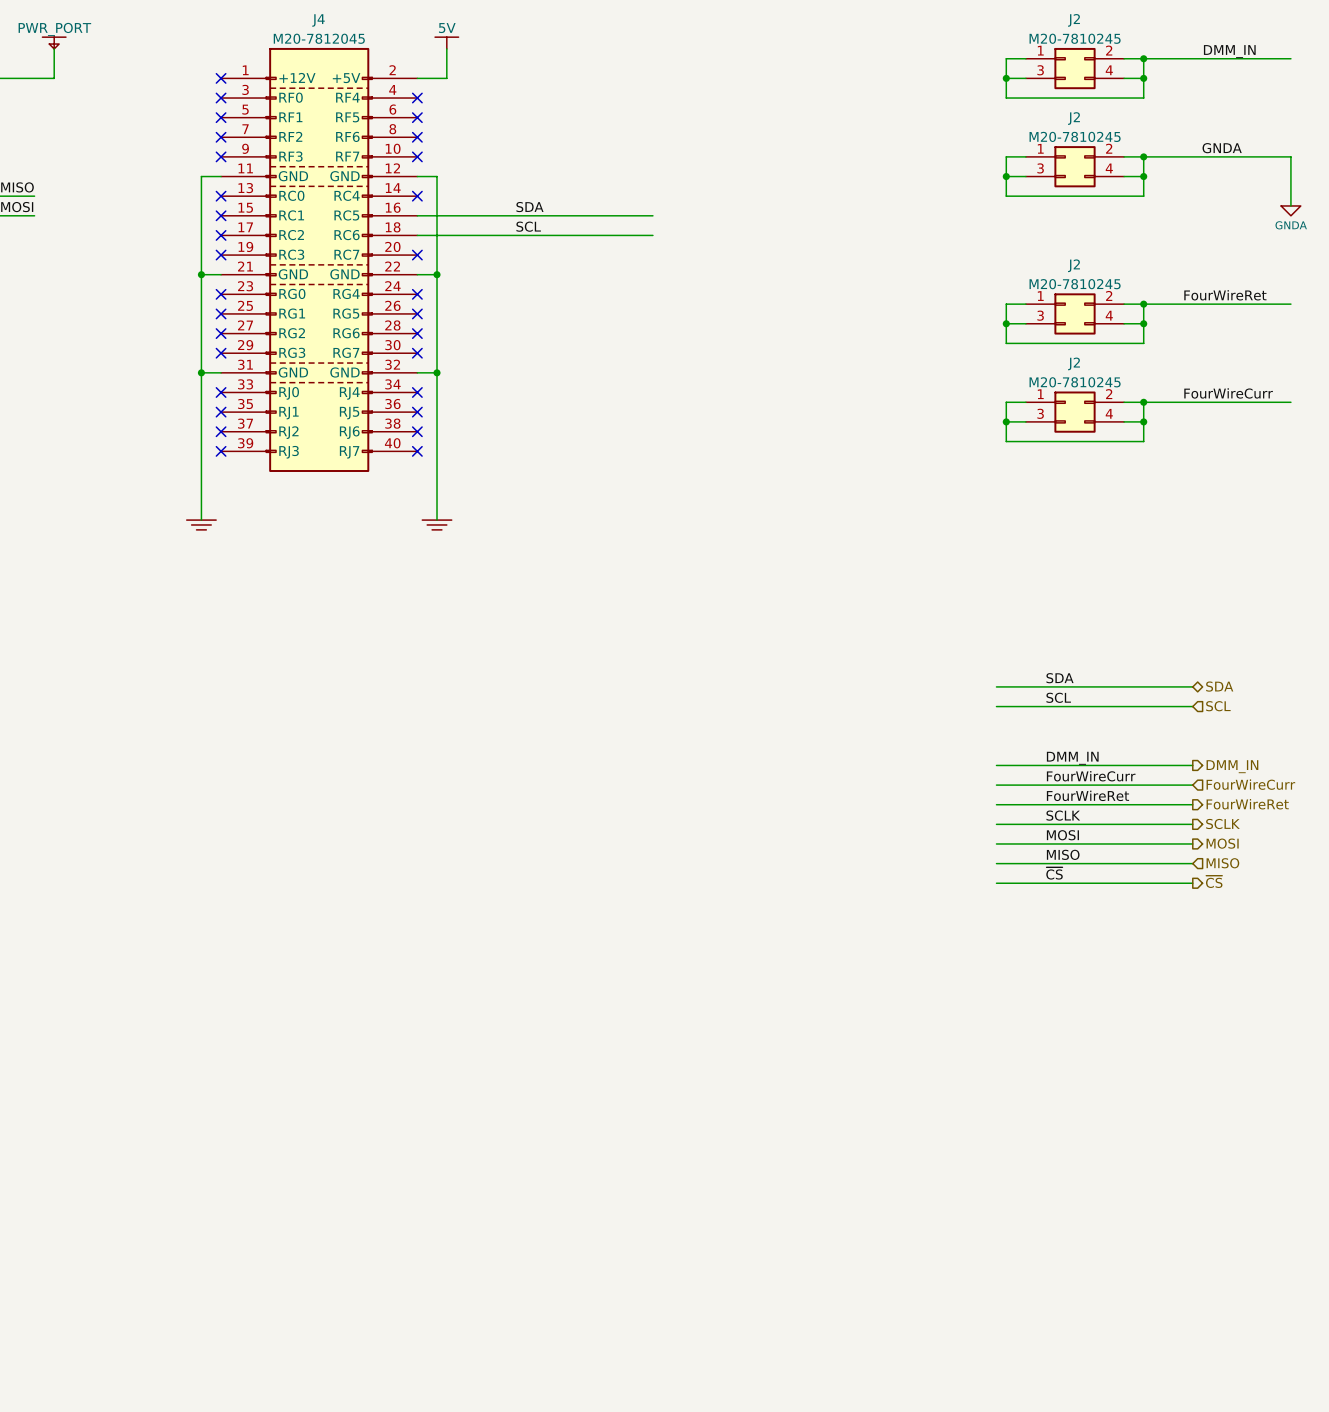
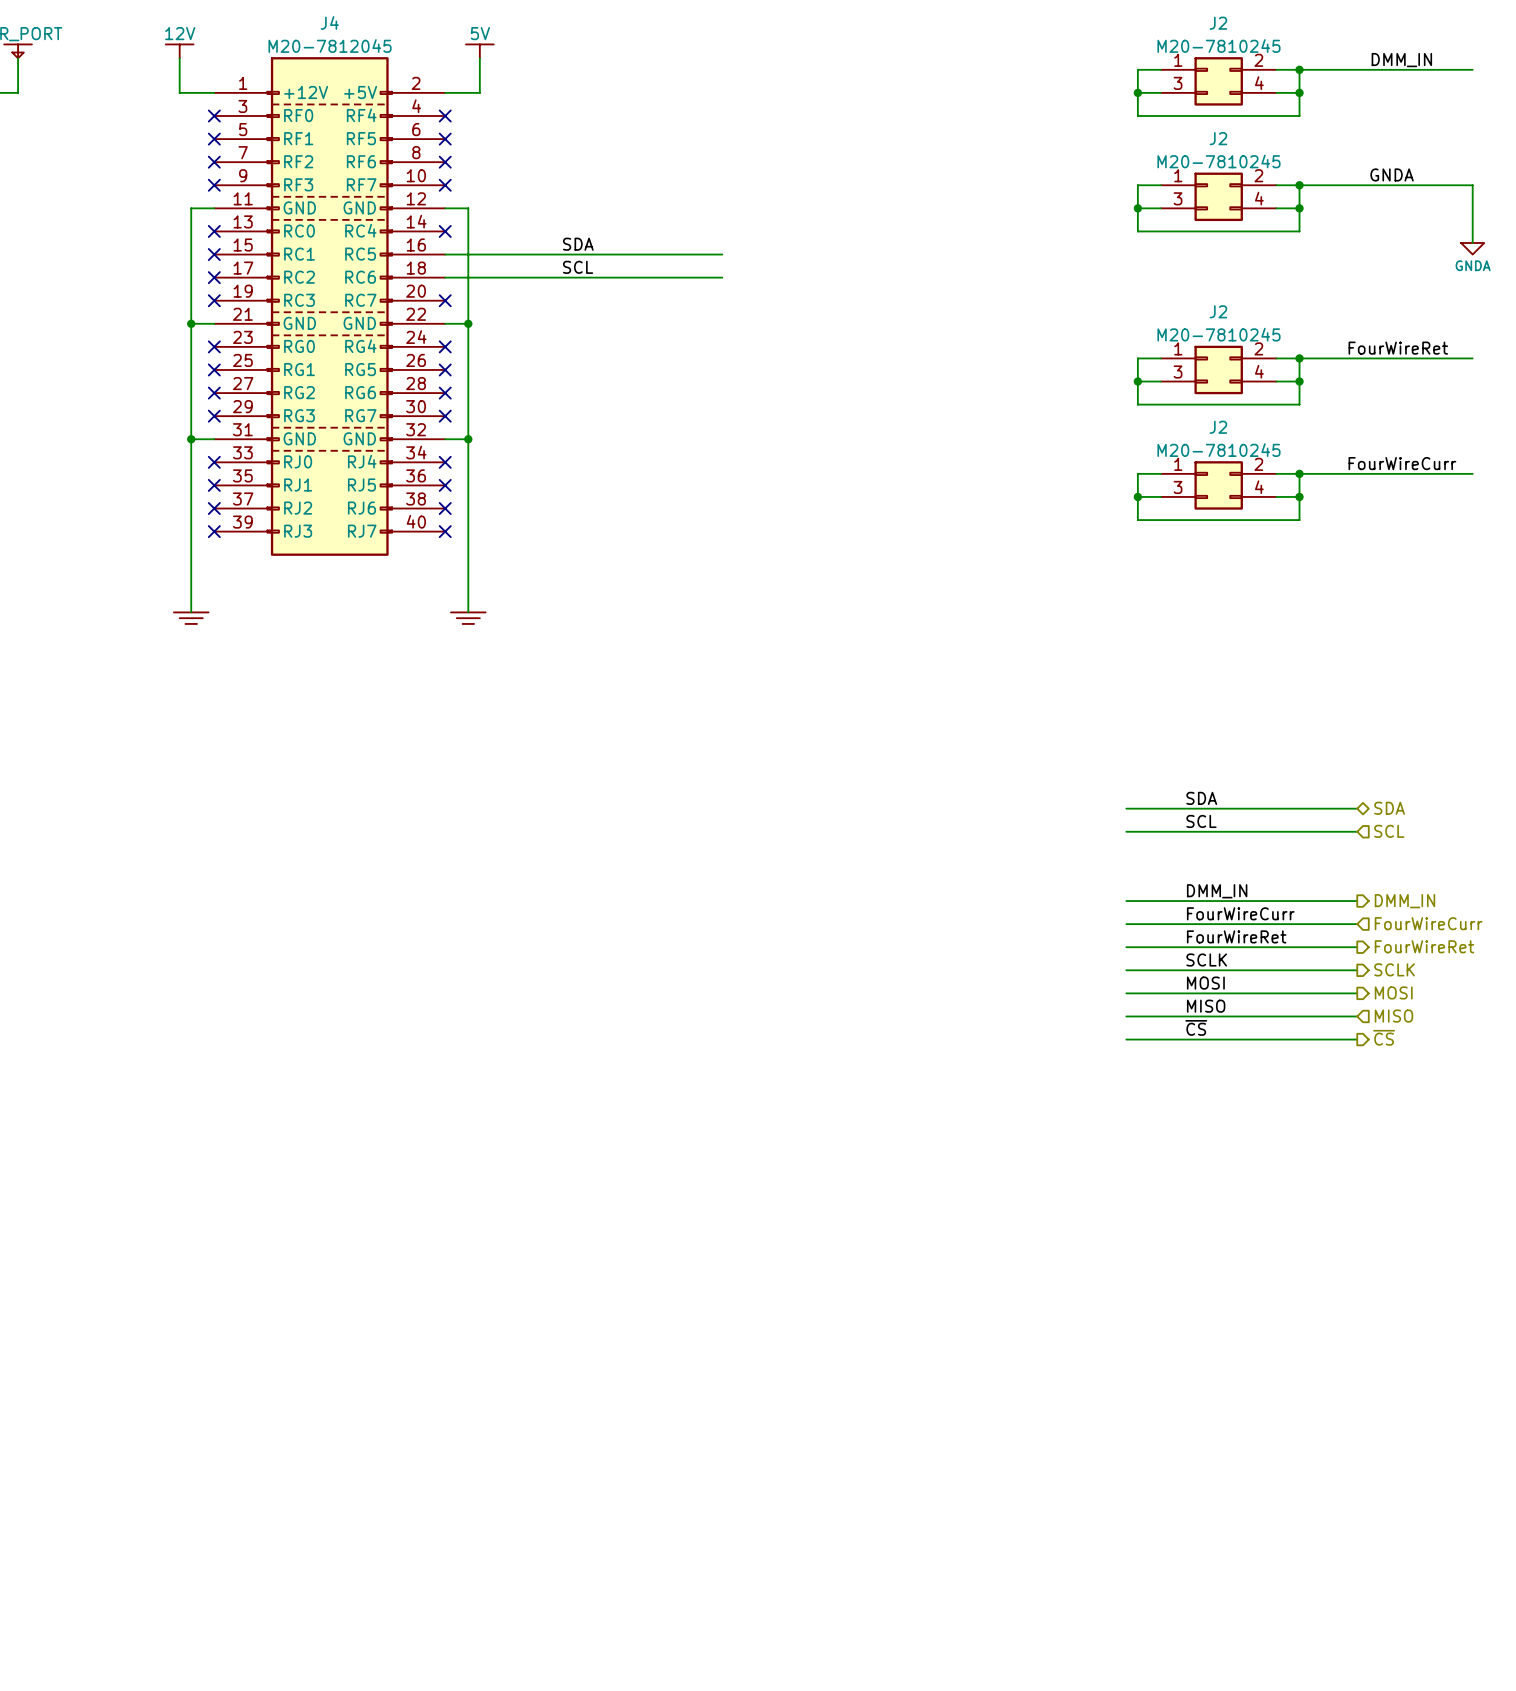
power symbol: none -> 12V (179, 51)
wire: none -> (179, 58) (179, 92) (214, 92)
no-connect mark: (221, 78) -> none

